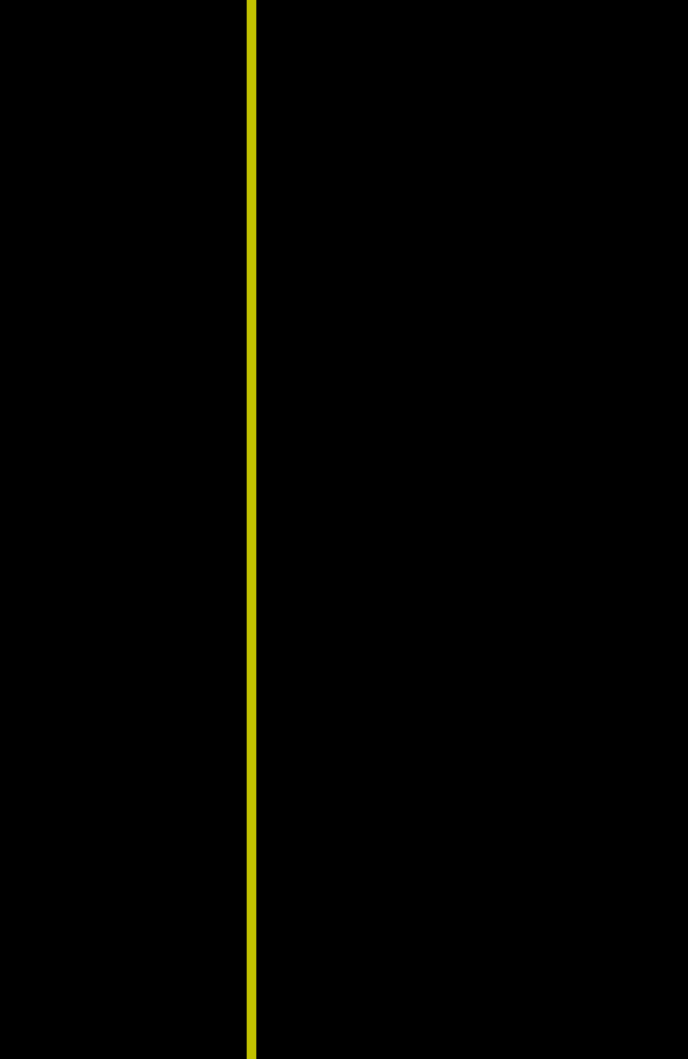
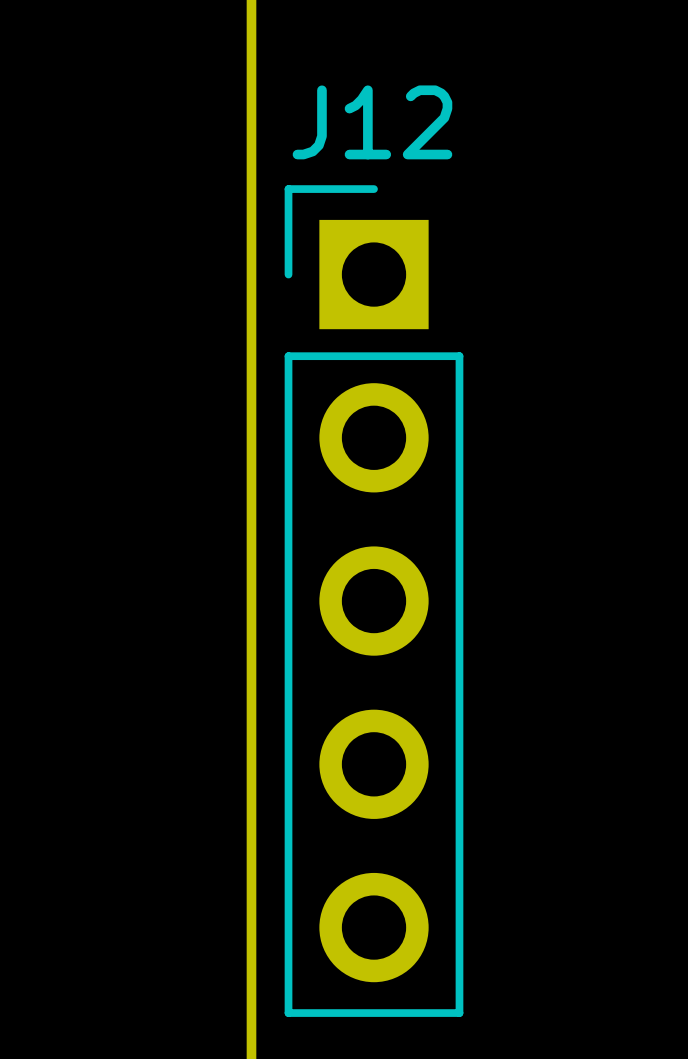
J12: none -> (374, 601)

